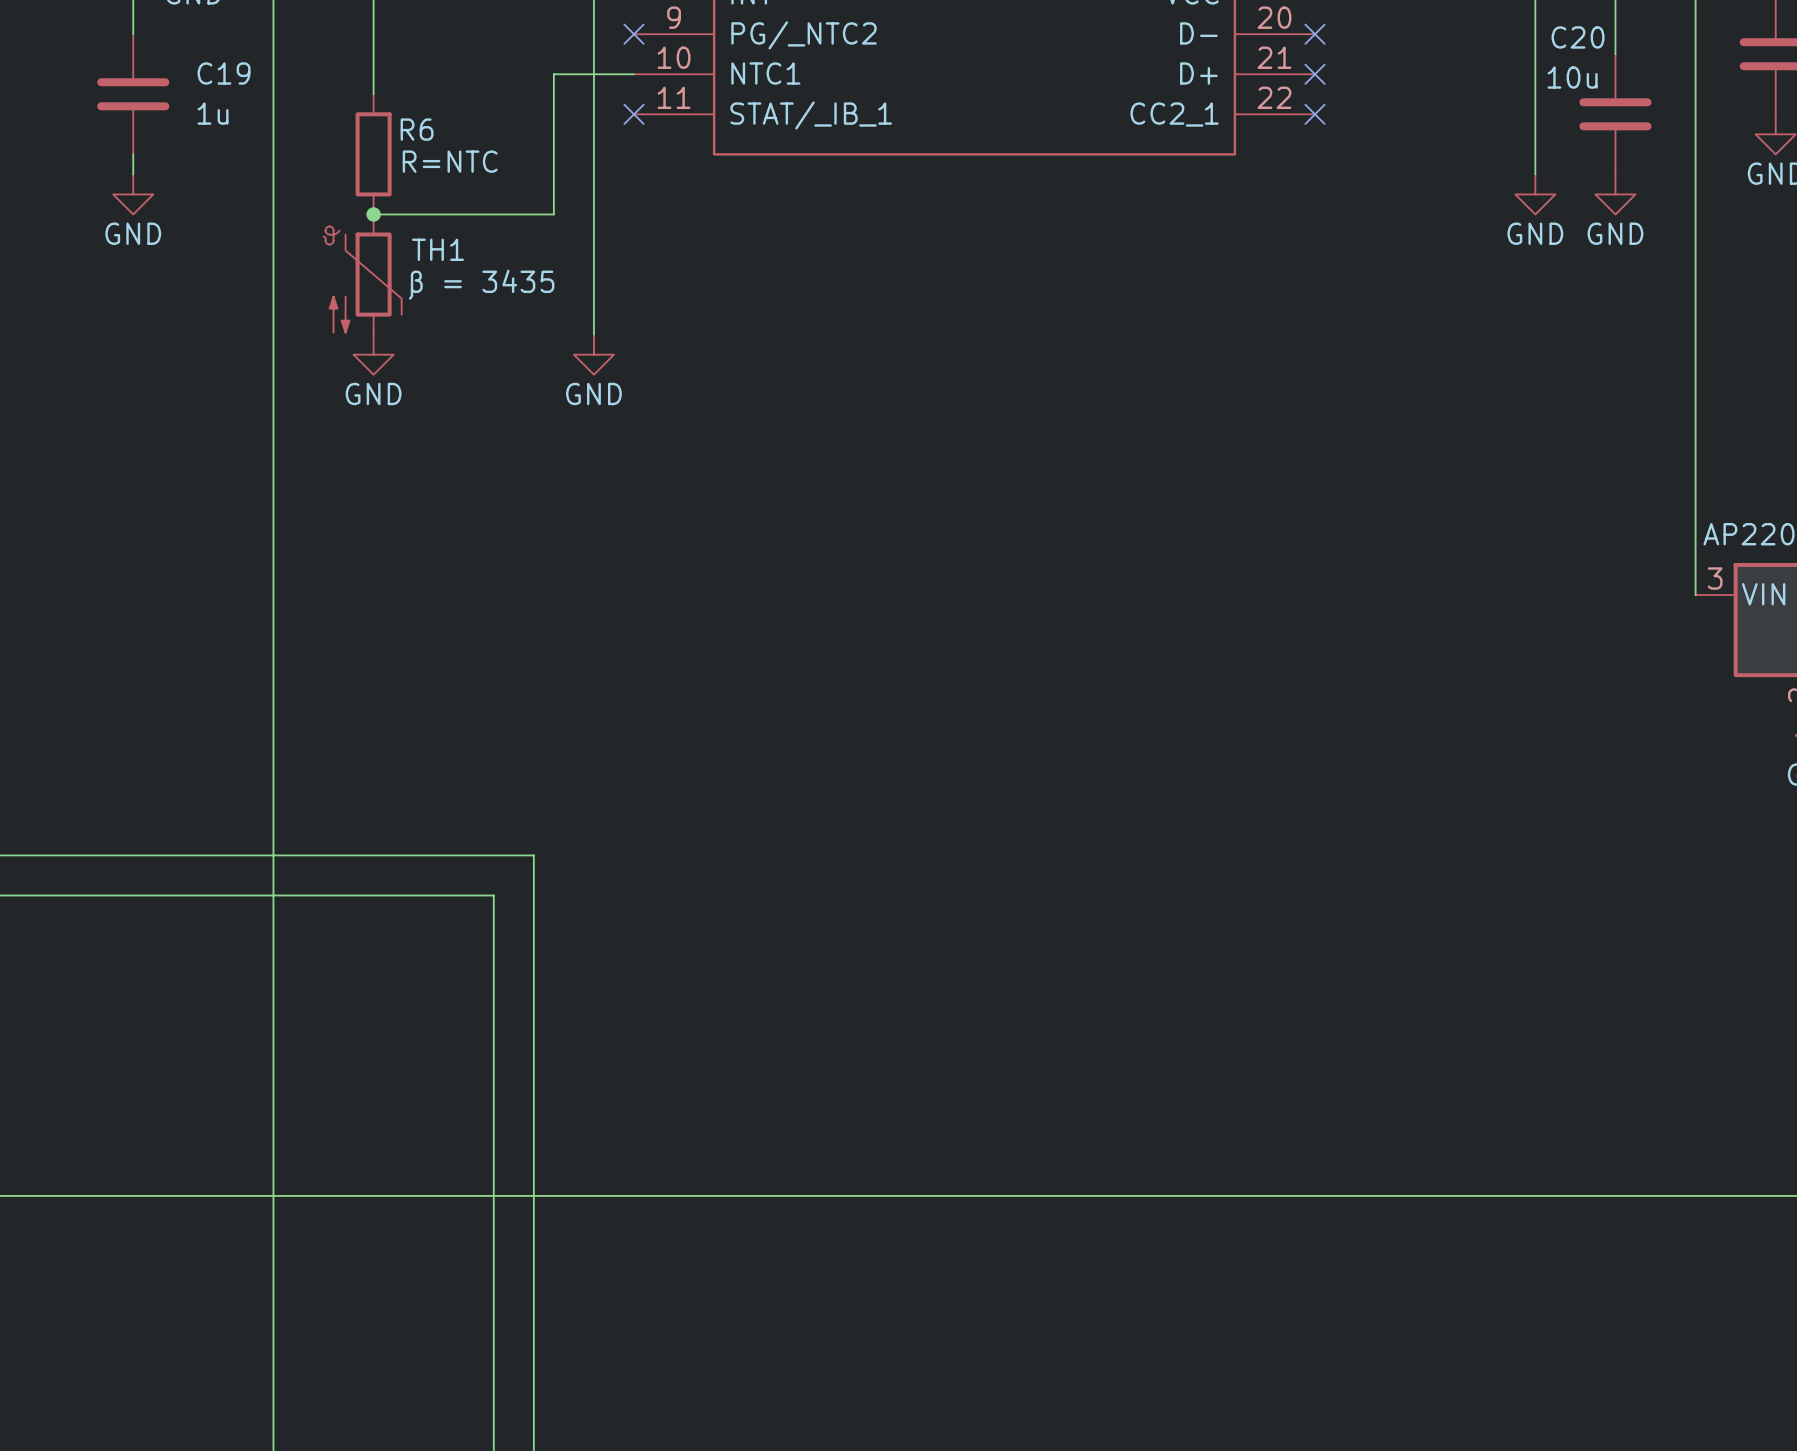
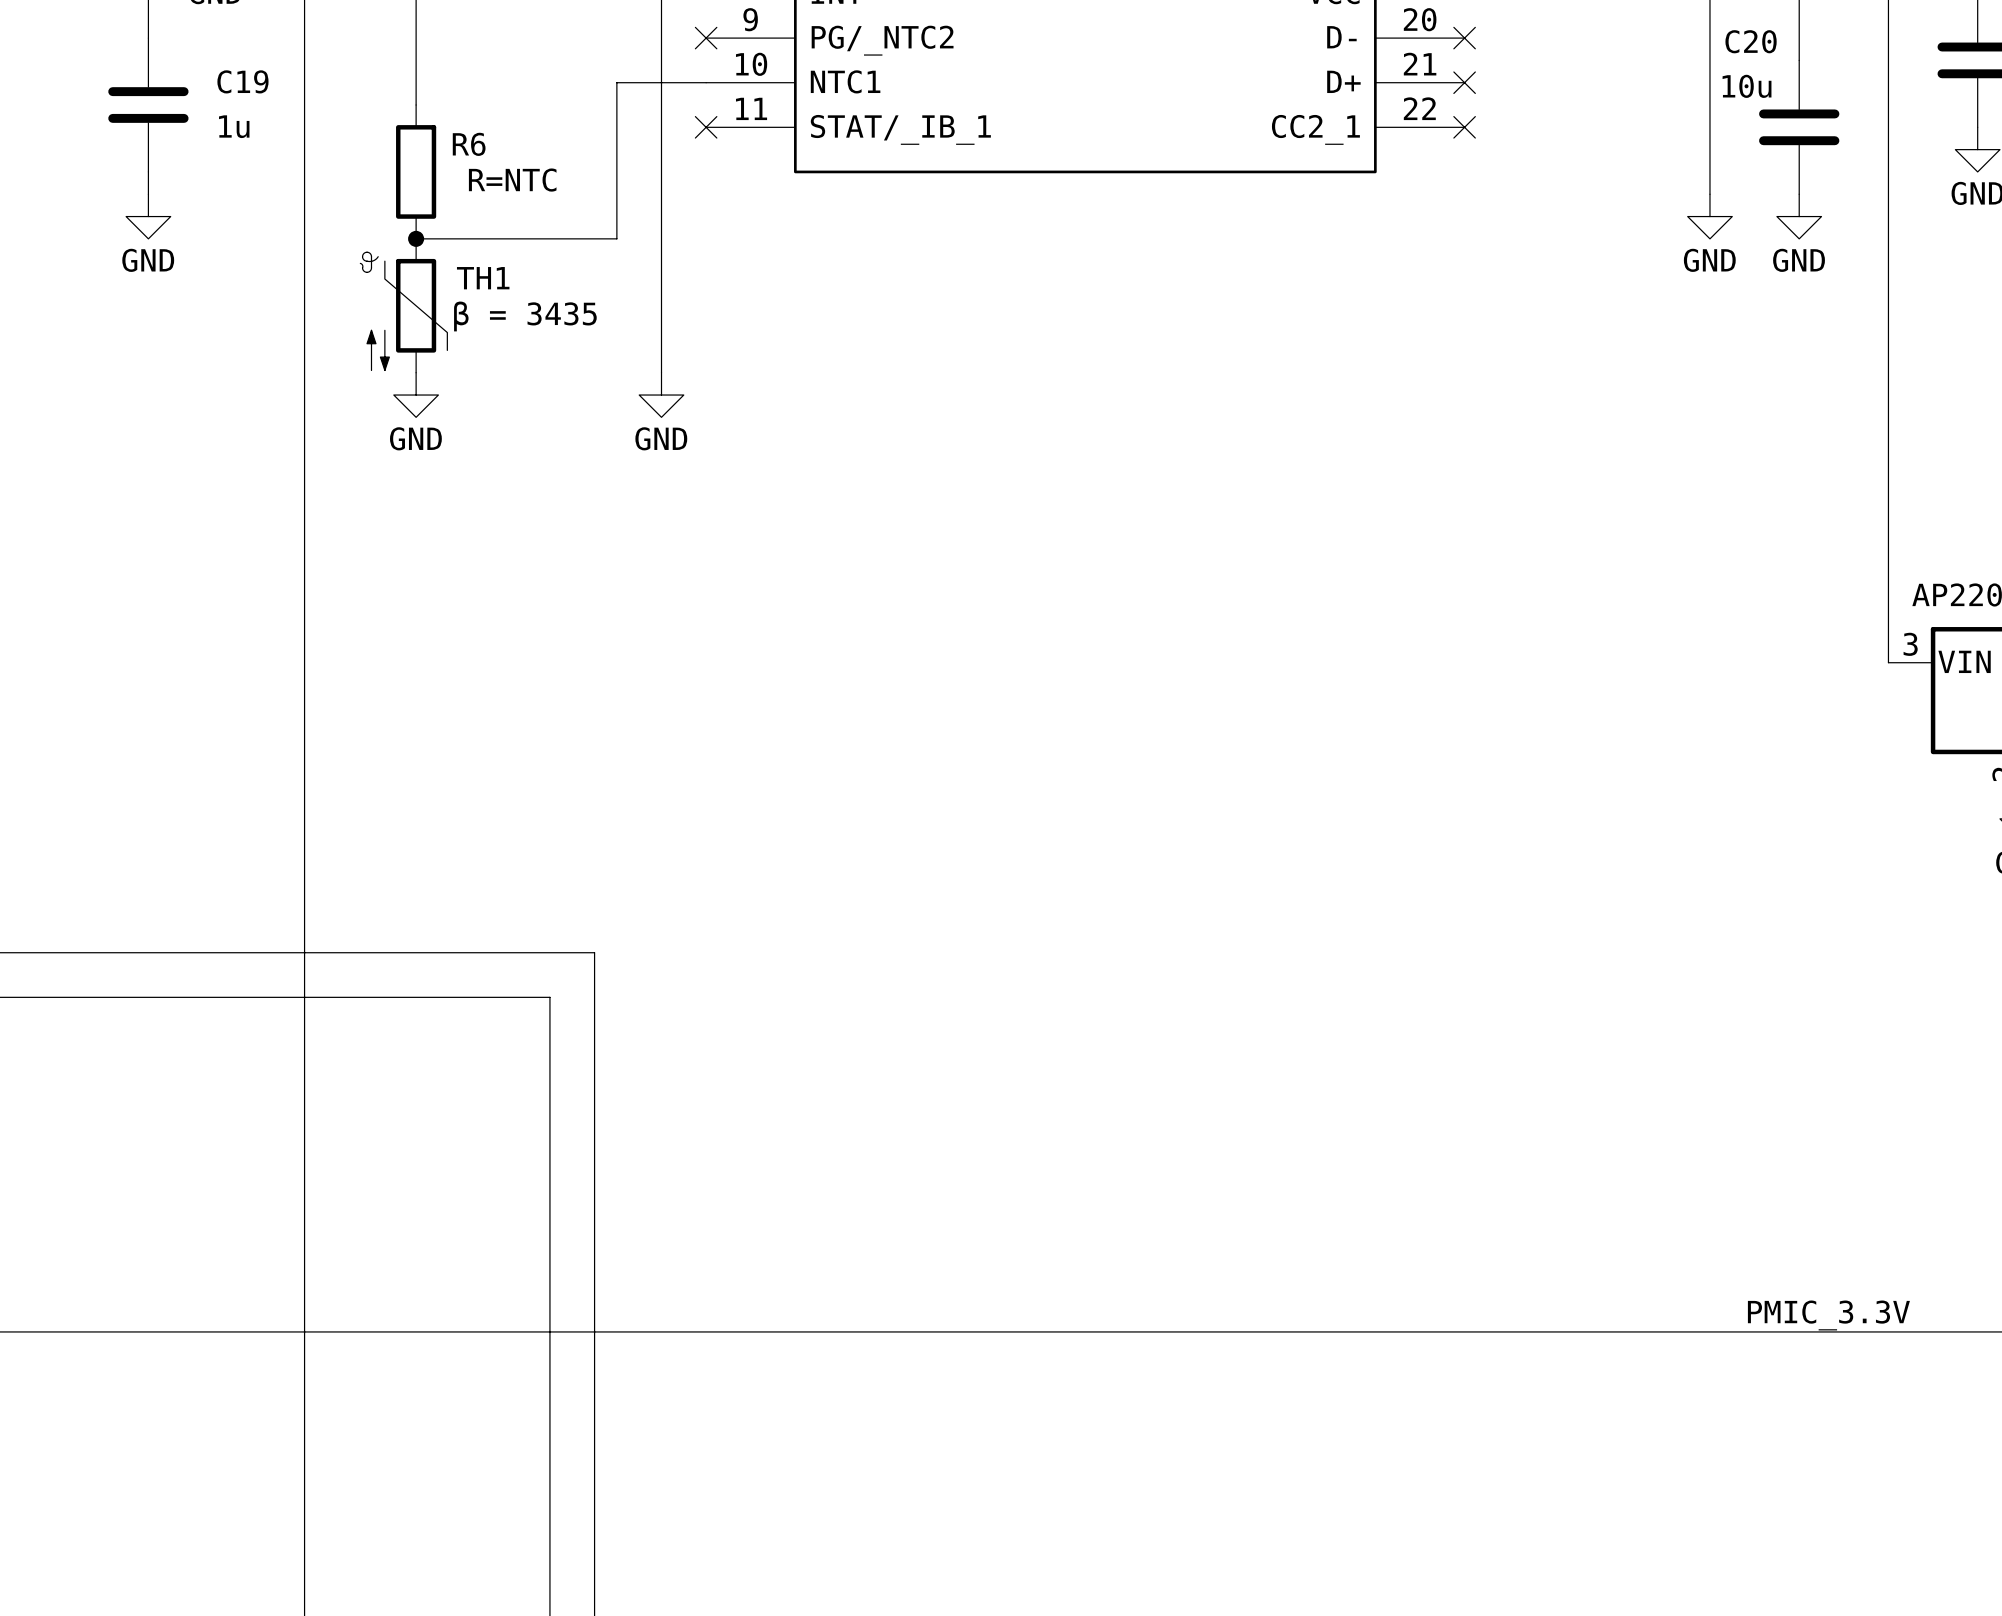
label: none -> PMIC_3.3V (1828, 1315)

